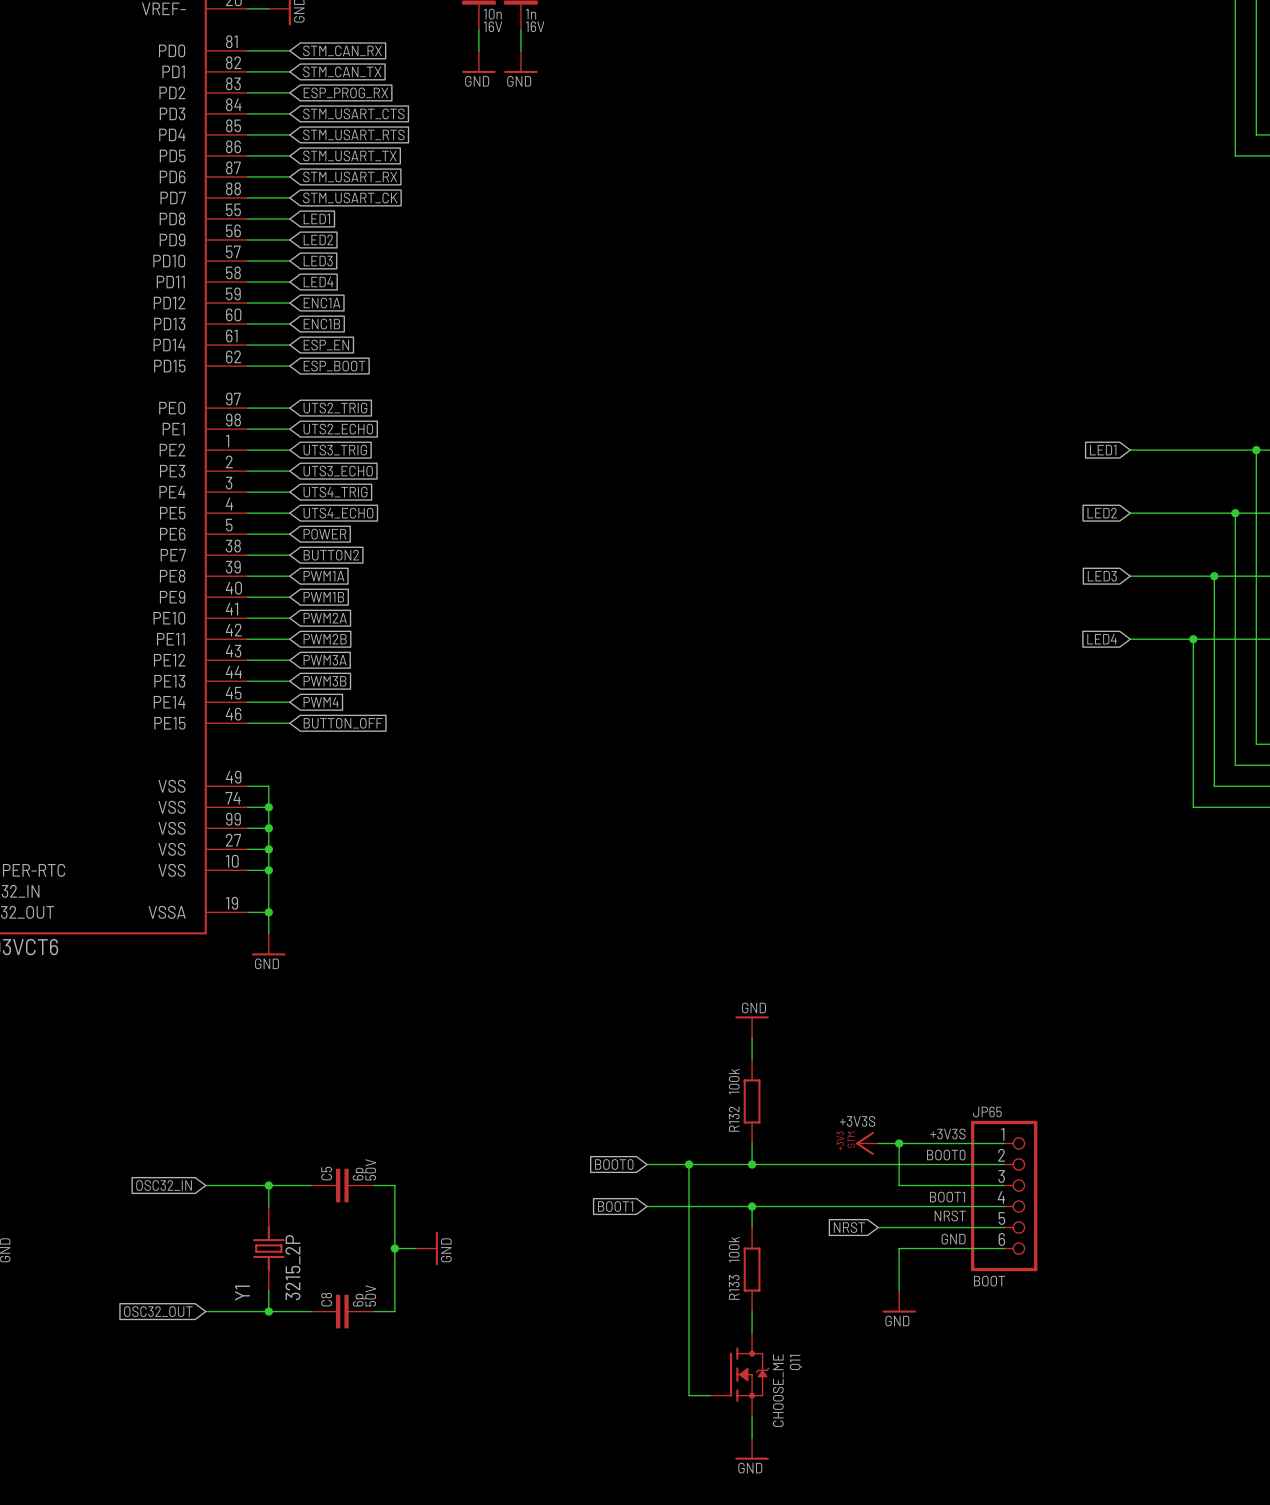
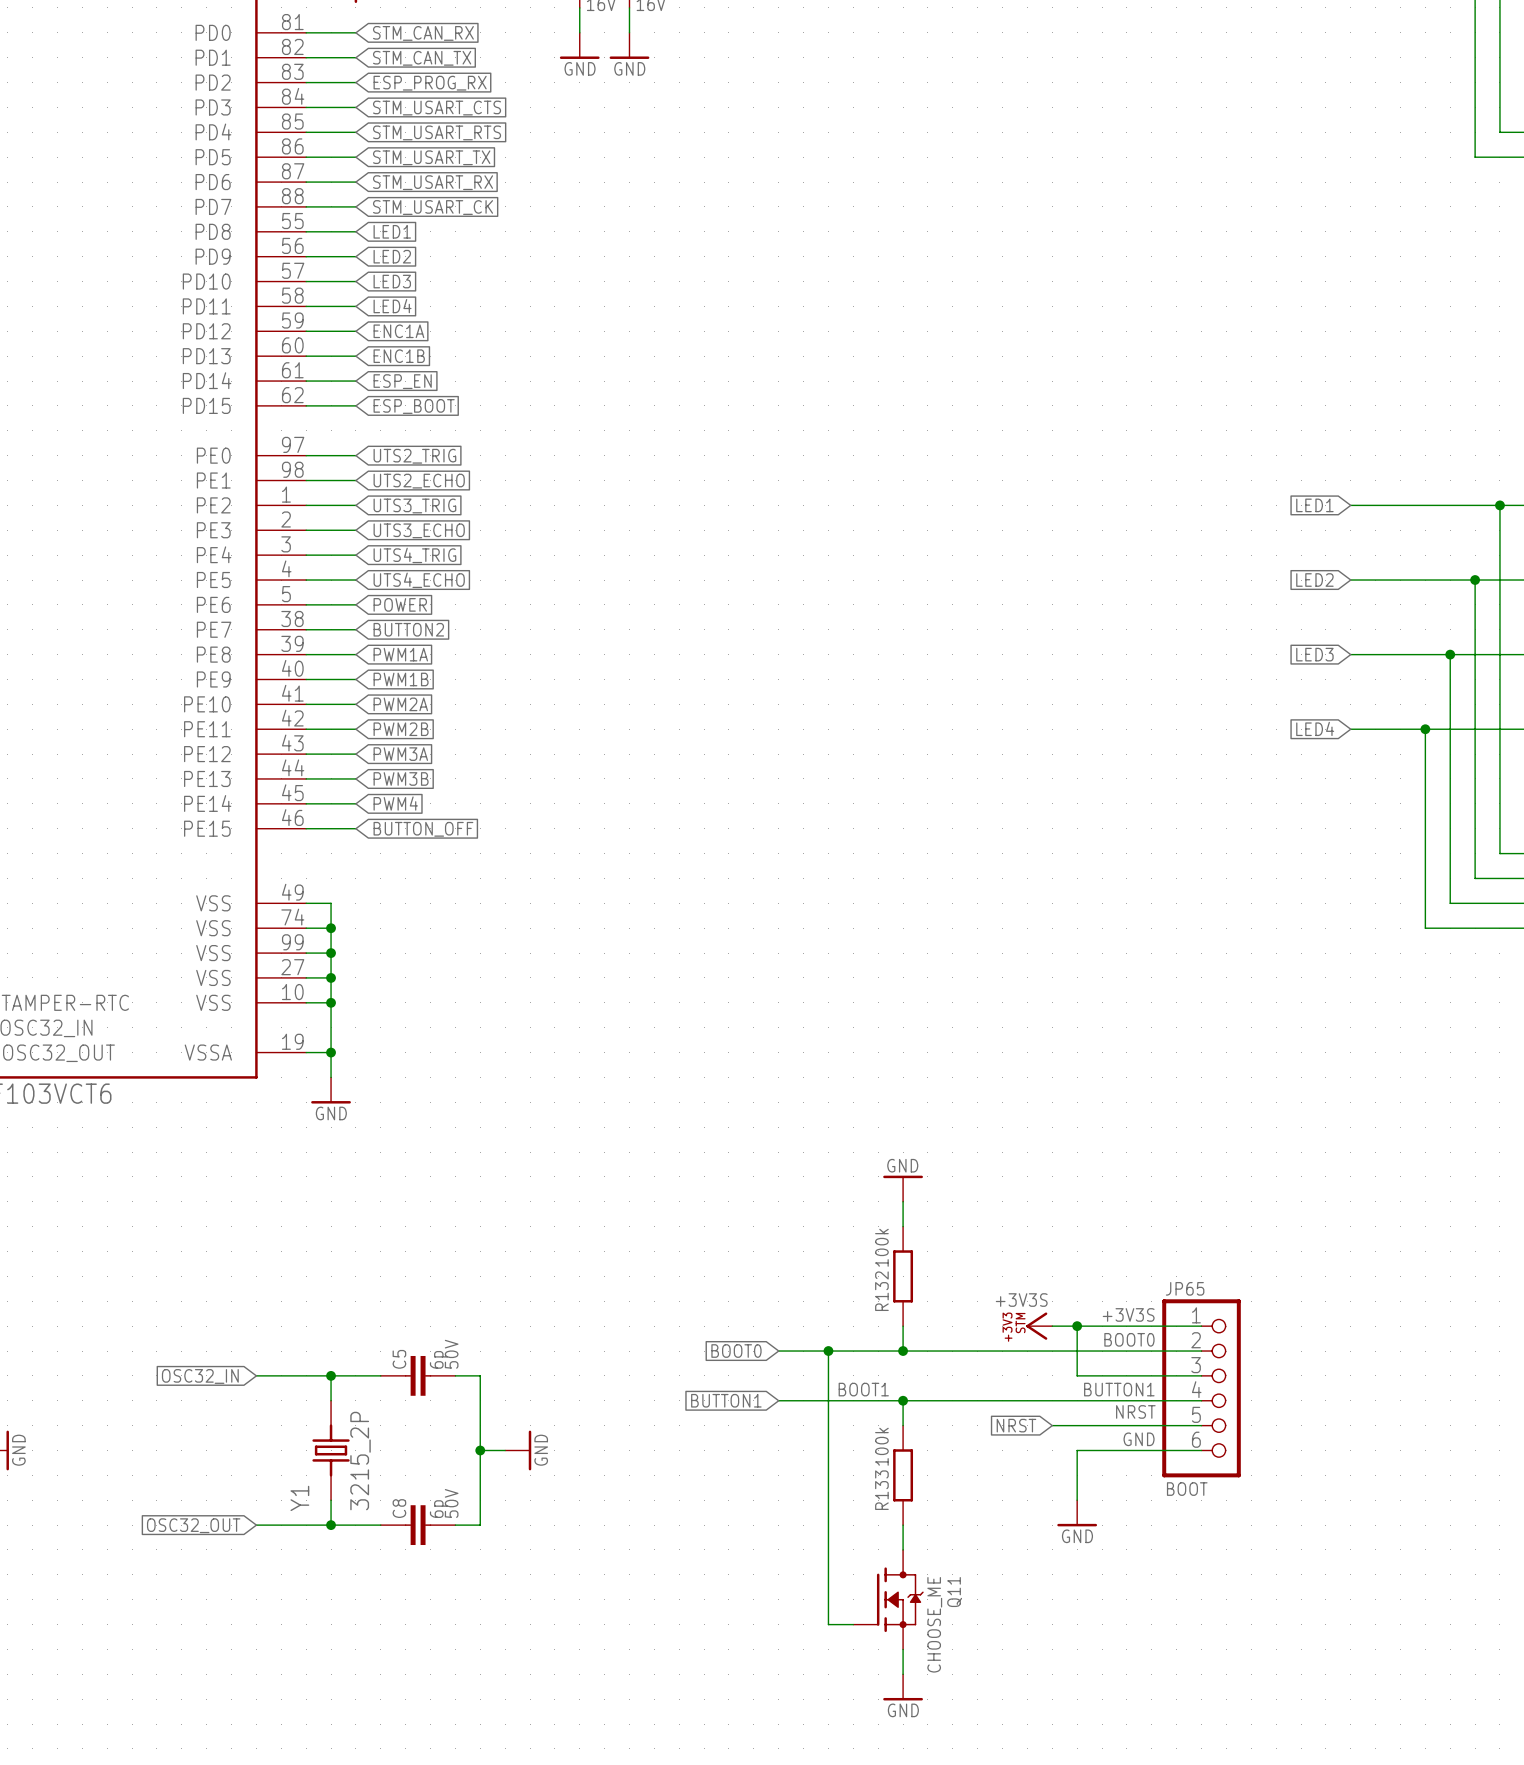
text: none -> BOOT1 (863, 1389)
label: BOOT1 (947, 1197) -> BUTTON1 (1119, 1389)
global label: BOOT1 (615, 1206) -> BUTTON1 (726, 1400)

